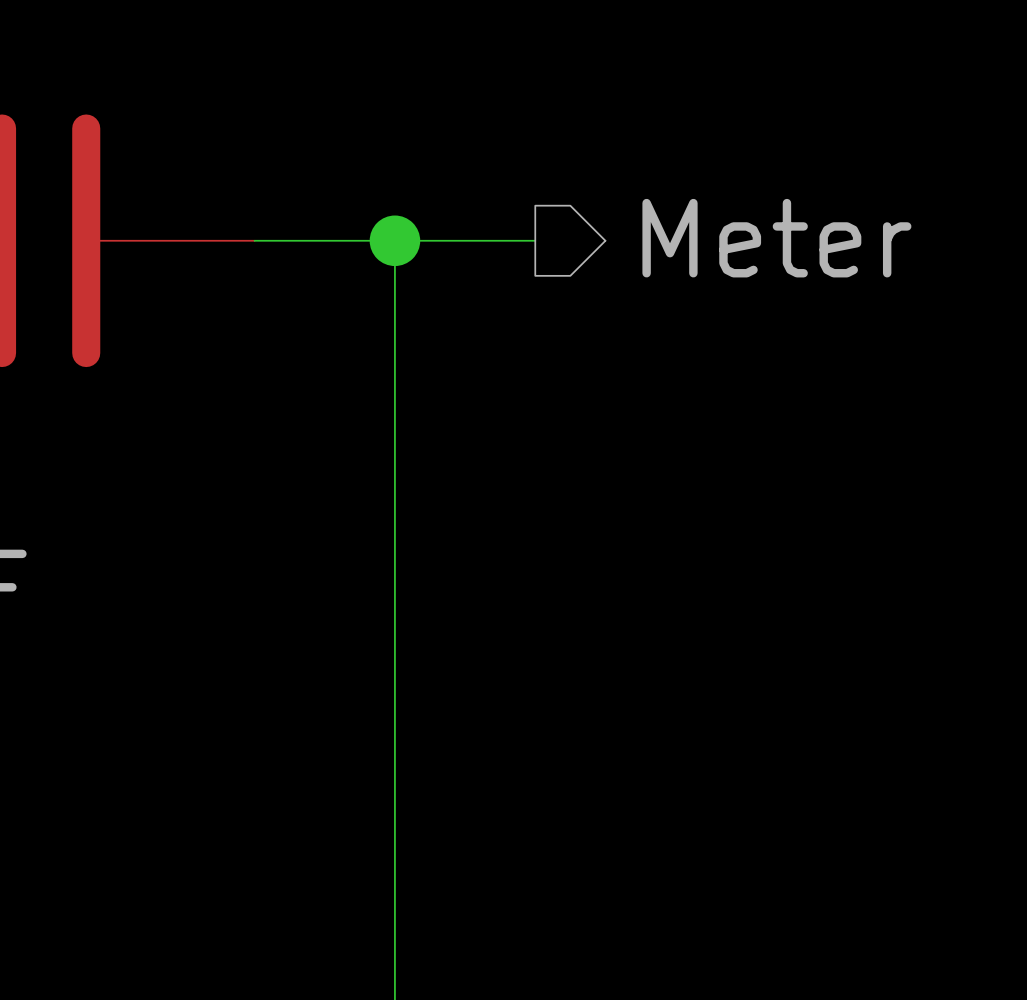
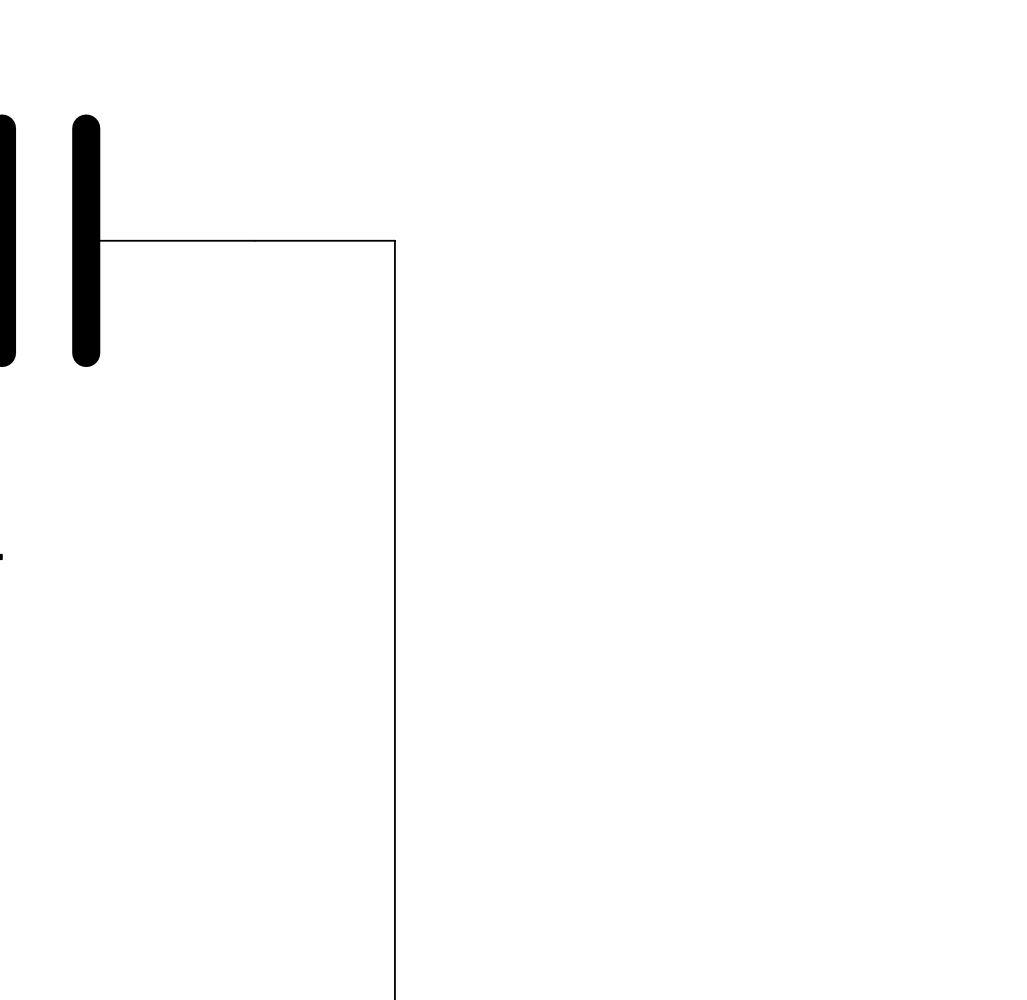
hierarchical label: Meter (776, 238) -> none
wire: (394, 240) (535, 240) -> none
junction: (394, 240) -> none

